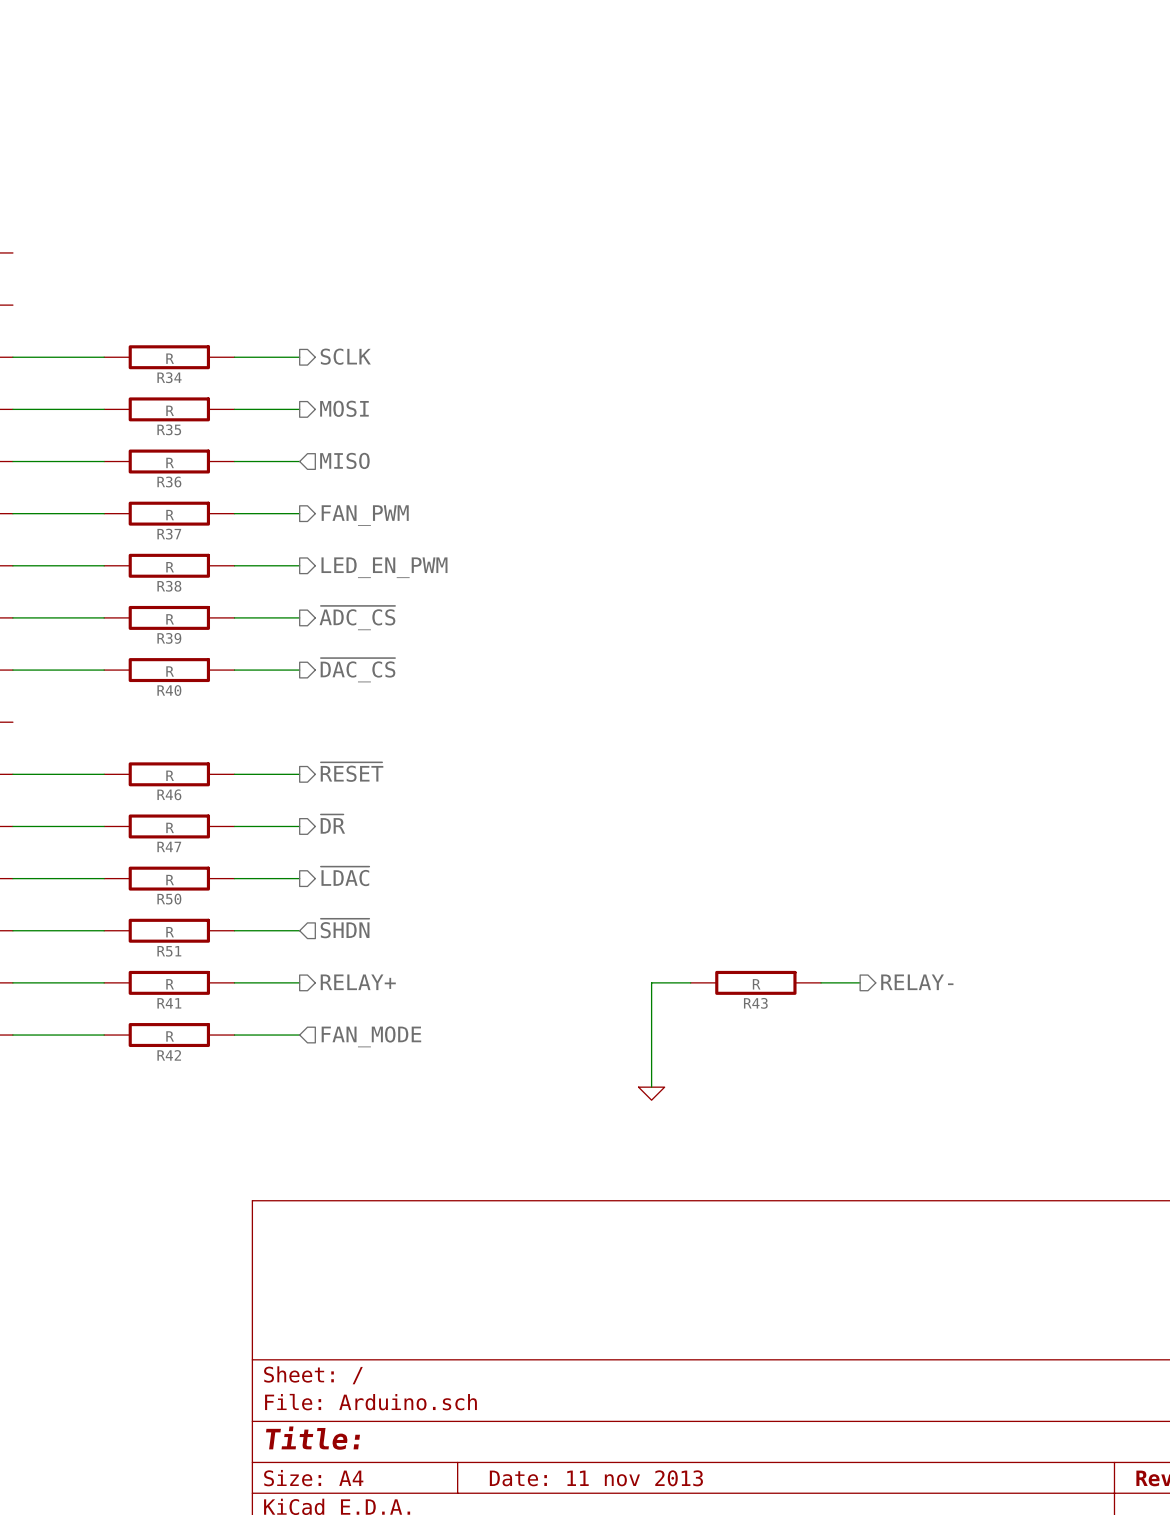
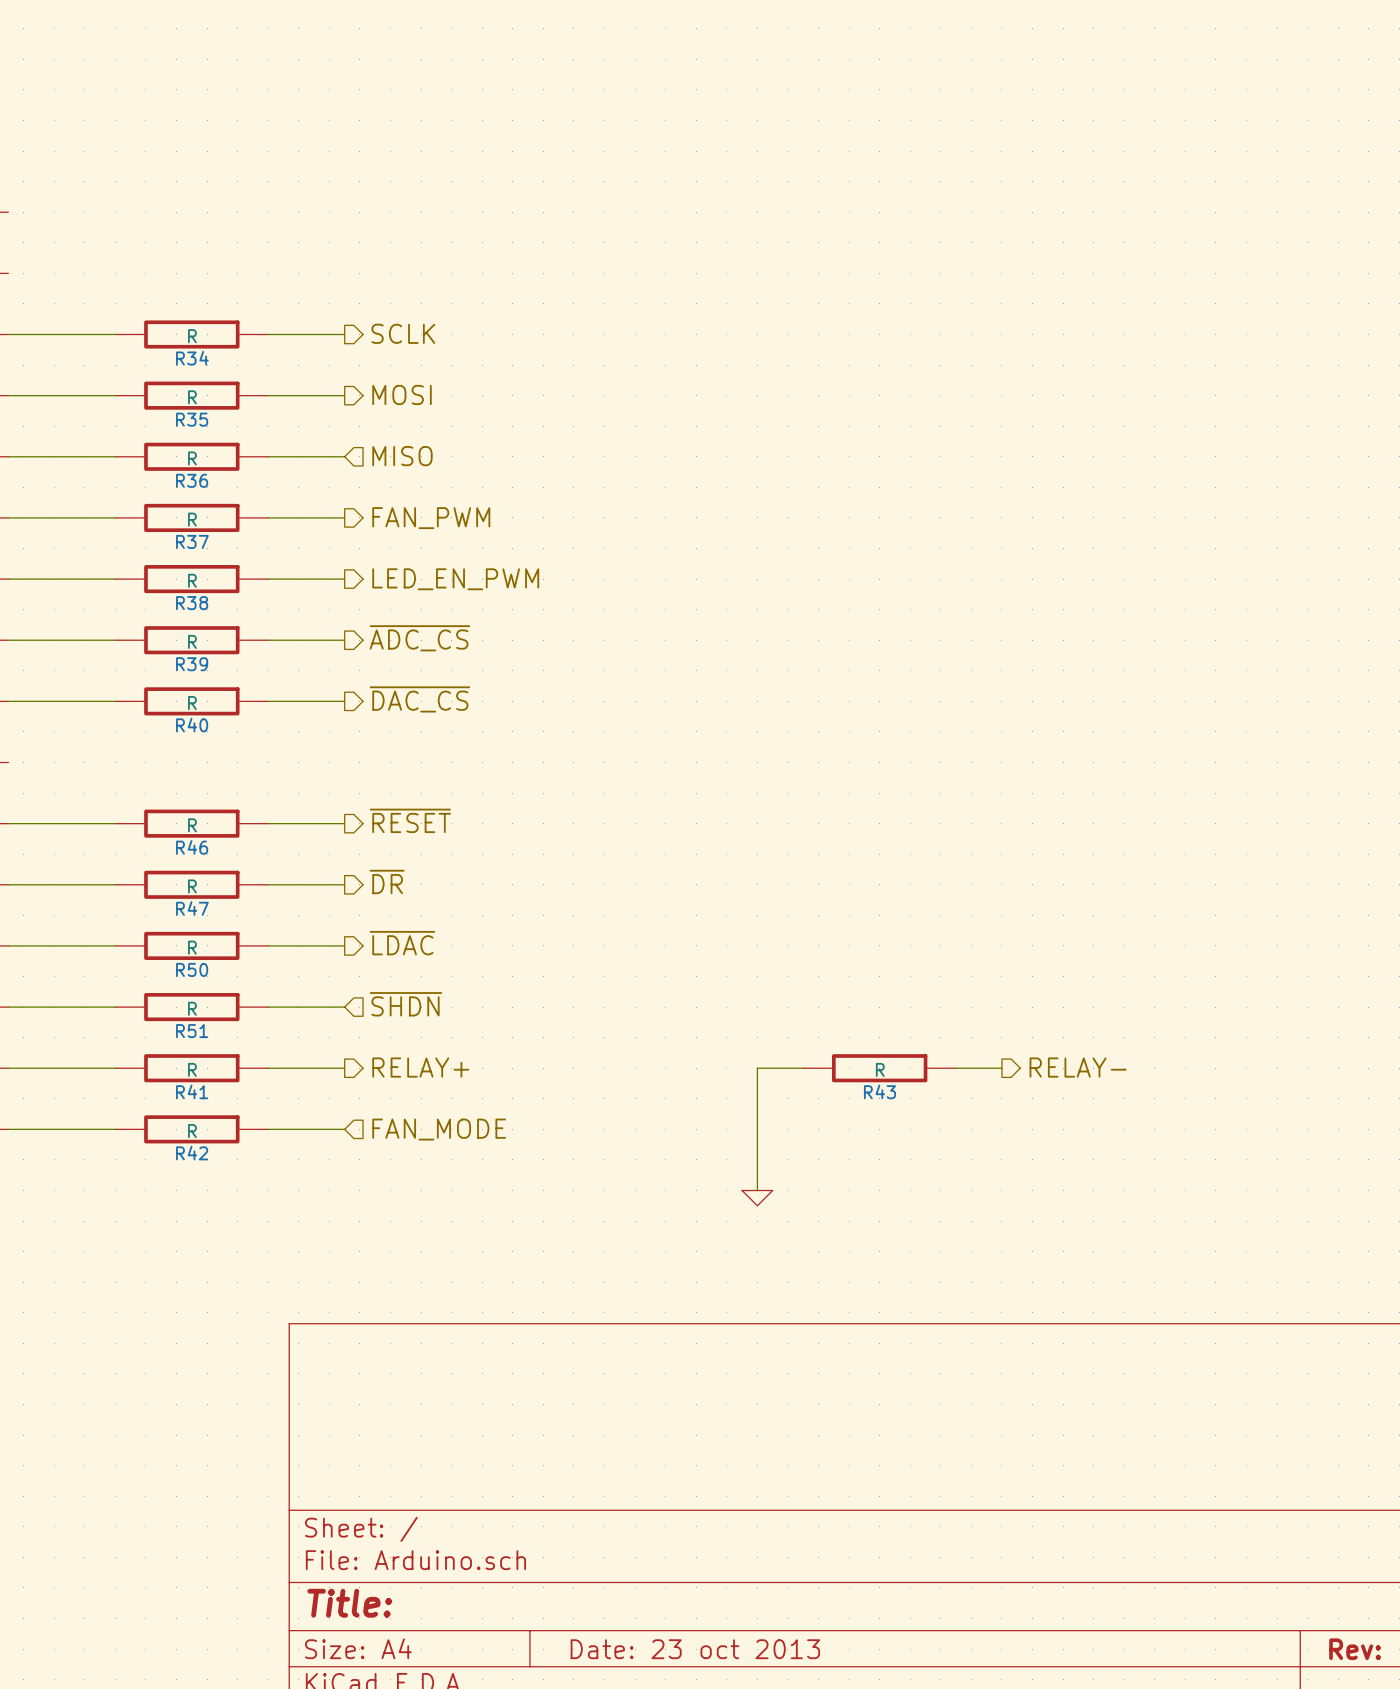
title block: Date: 11 nov 2013 (596, 1478) -> Date: 23 oct 2013 (695, 1649)

